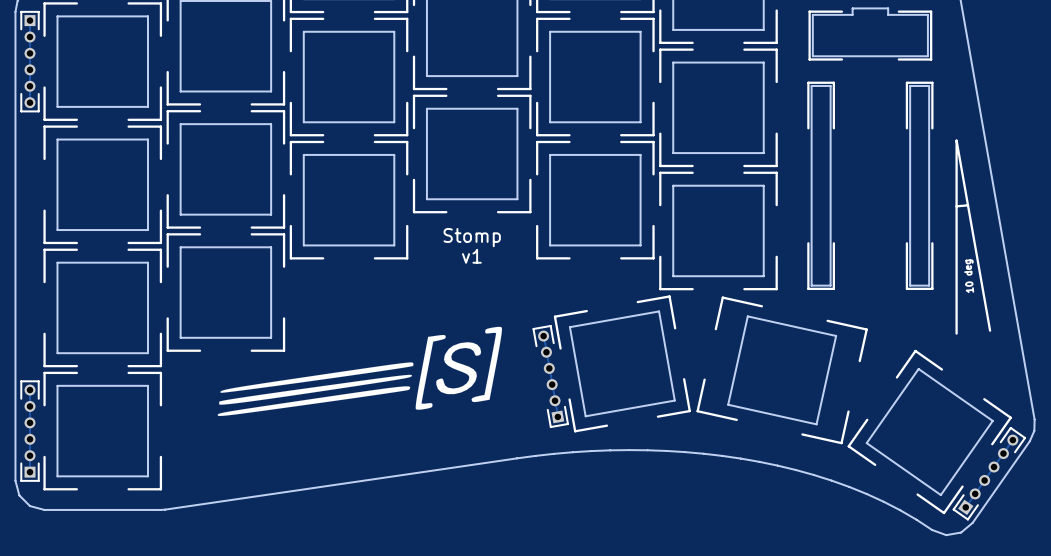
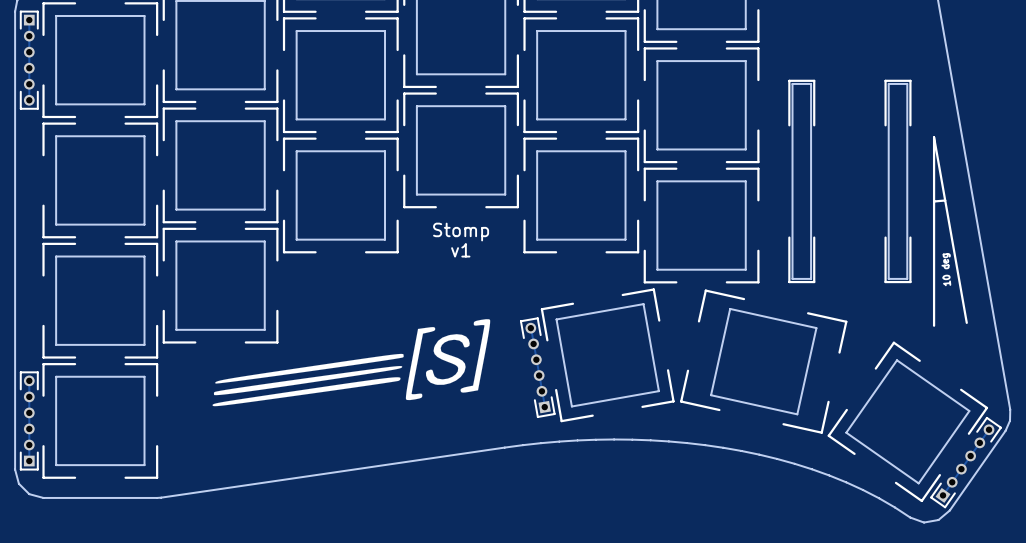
board edge: (852, 8) (852, 14) (812, 14) (812, 56) (927, 56) (927, 14) (888, 14) (888, 8) (852, 8) -> none
line: (841, 11) (809, 11) (809, 59) (841, 59) -> none
line: (898, 11) (931, 11) (931, 59) (898, 59) -> none

